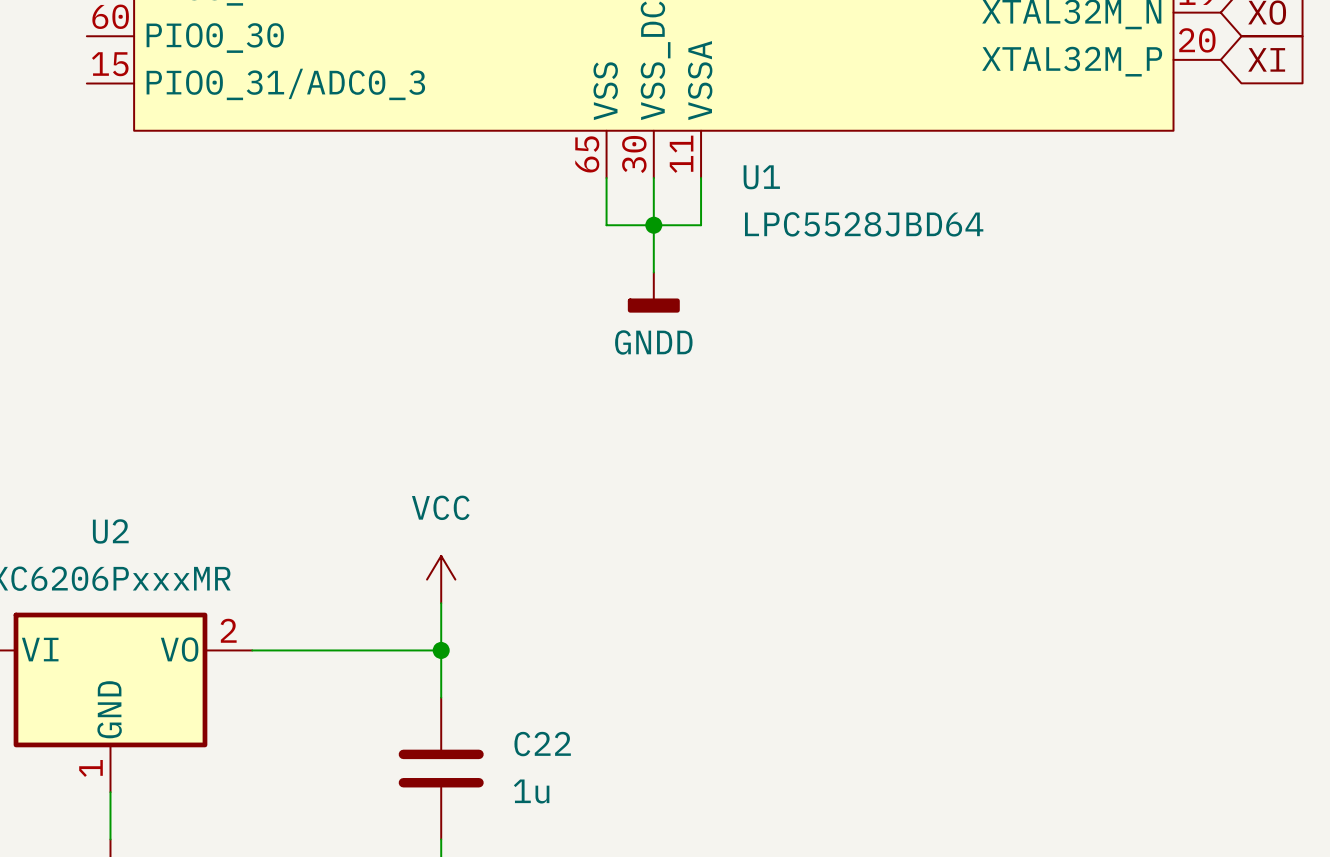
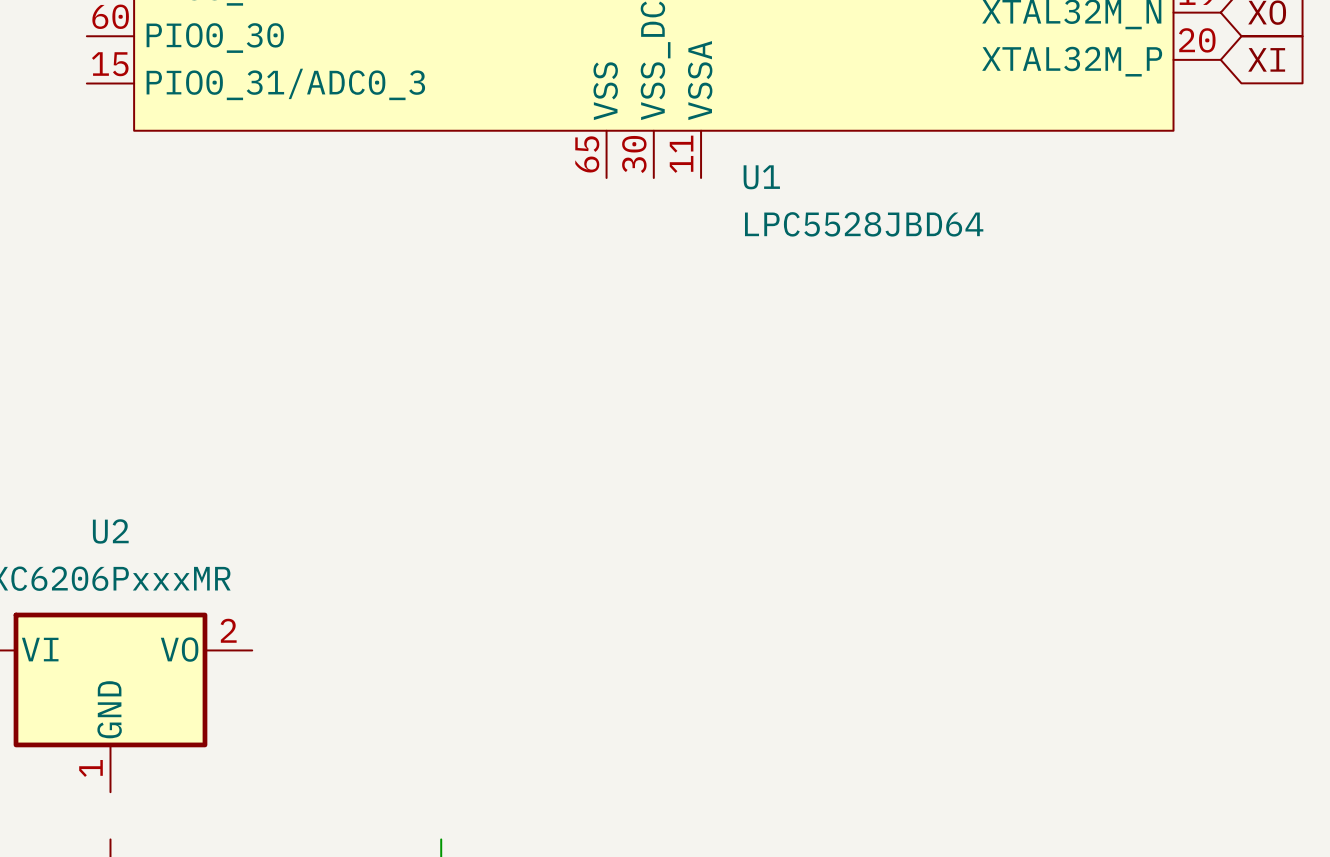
wire: (606, 177) (606, 225) (701, 225) (701, 177) -> none
wire: (653, 177) (653, 272) -> none
junction: (653, 225) -> none
power symbol: GNDD (653, 292) -> none
power symbol: VCC (441, 579) -> none
wire: (441, 603) (441, 697) -> none
wire: (252, 650) (441, 650) -> none
junction: (441, 650) -> none
C22: 1u (441, 768) -> none
wire: (110, 792) (110, 839) -> none

